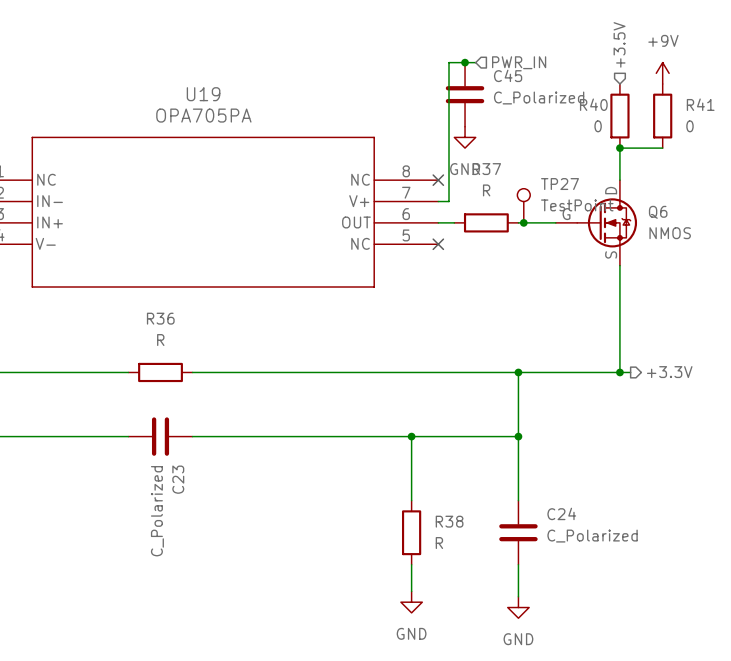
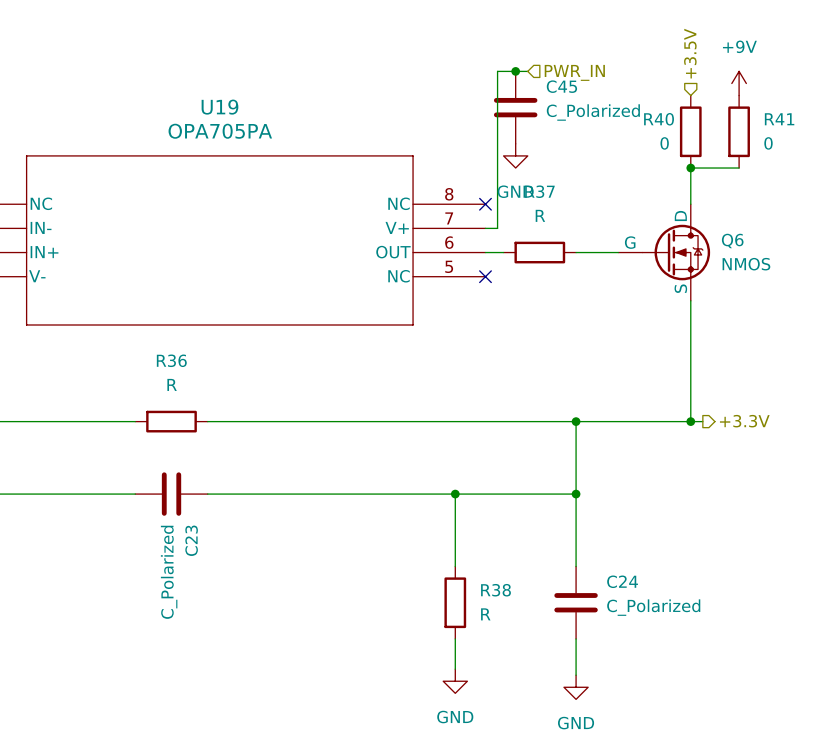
TP27: TestPoint (523, 205) -> none
junction: (523, 222) -> none

